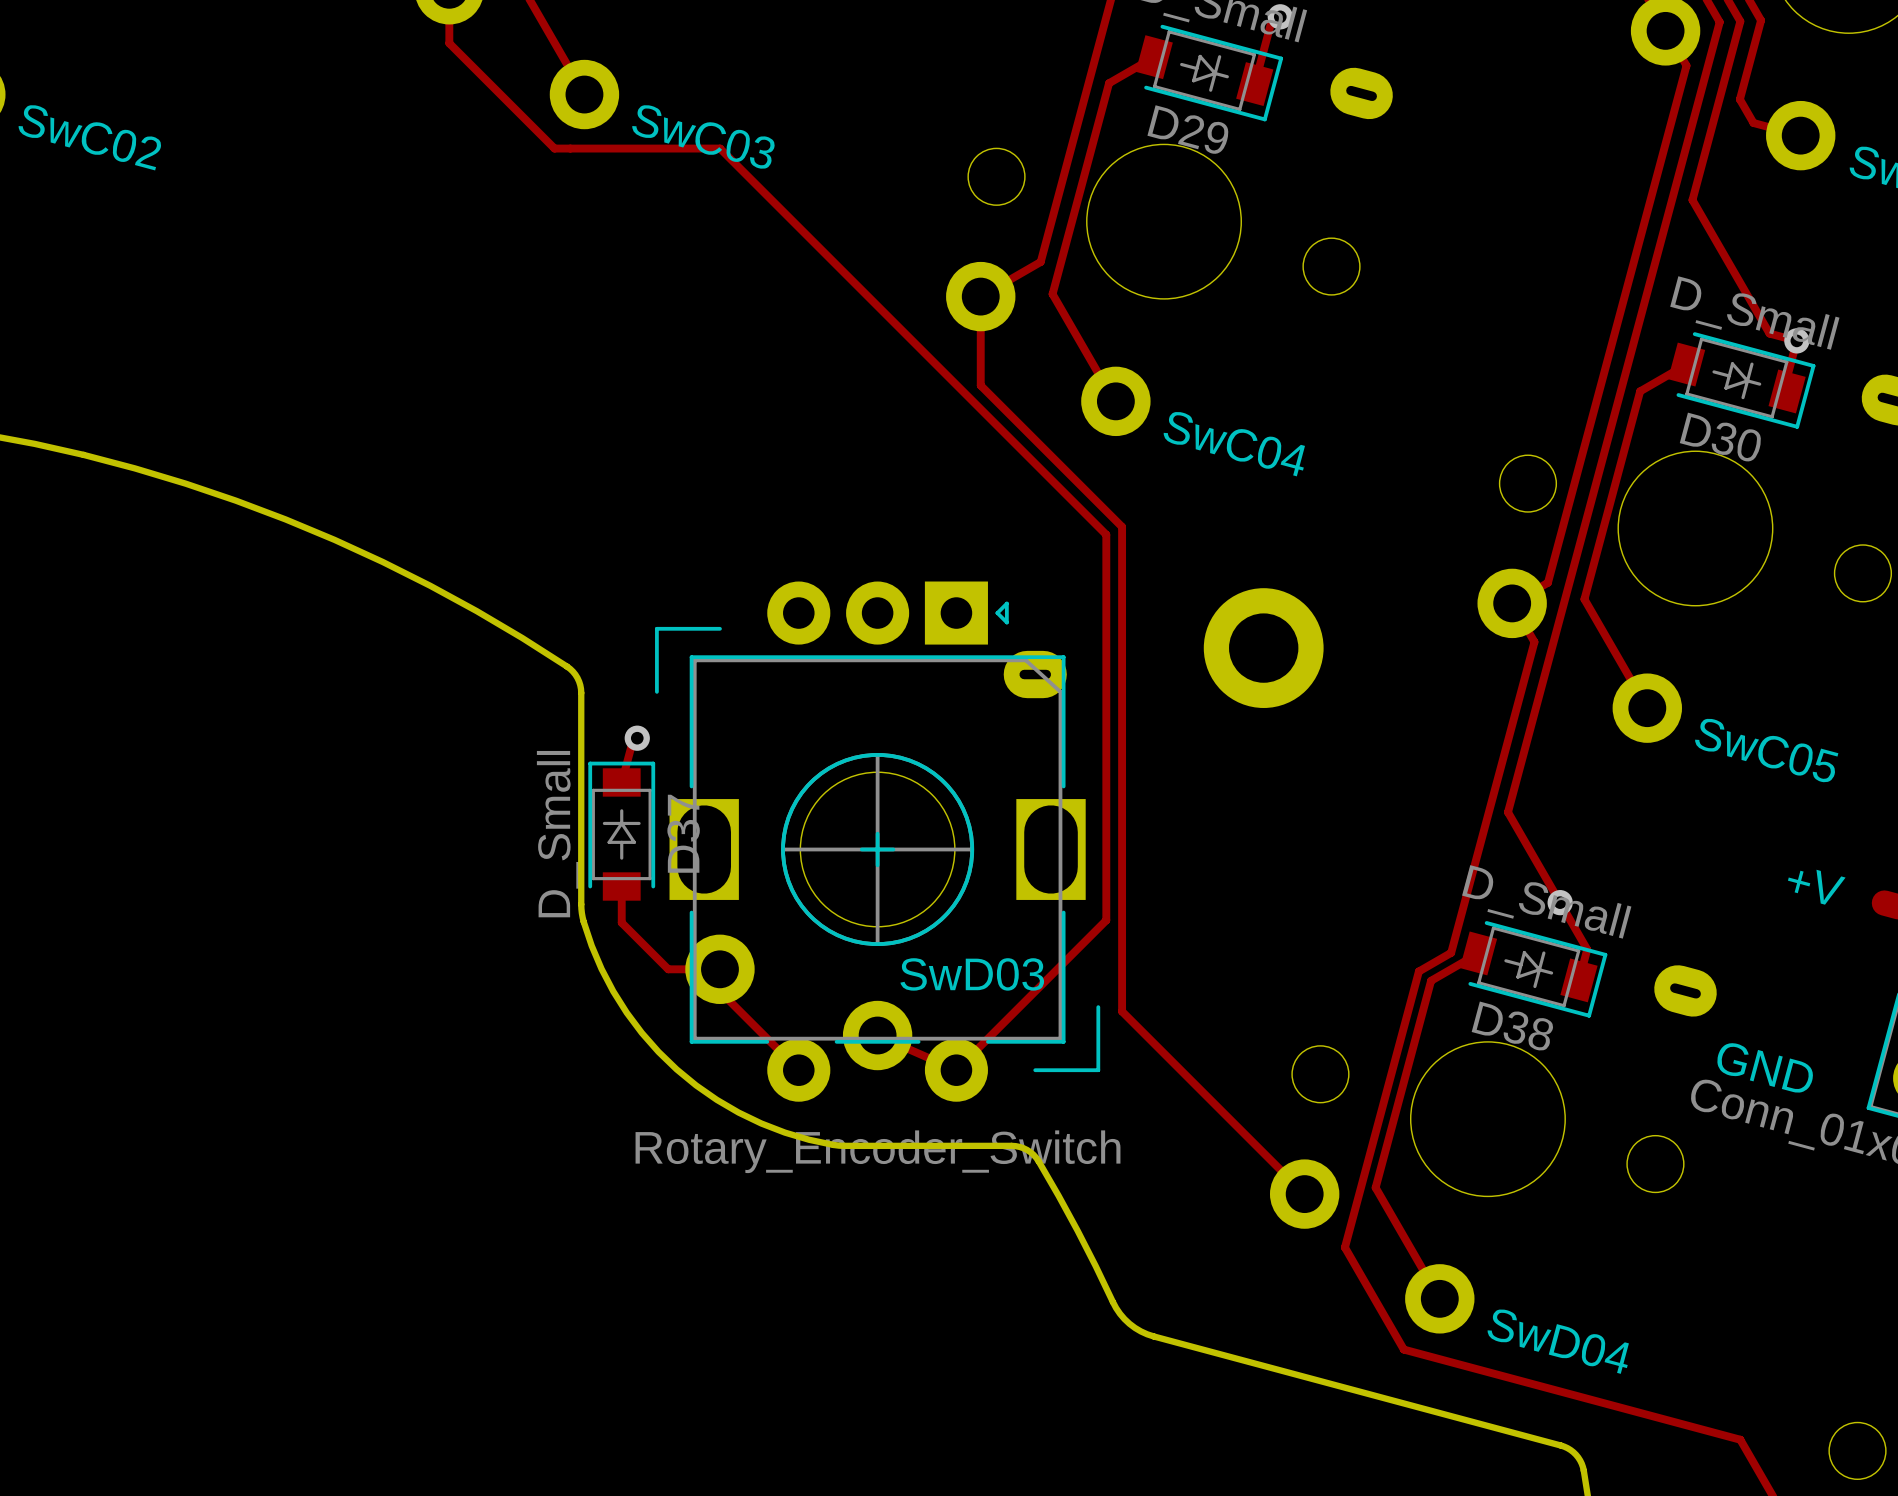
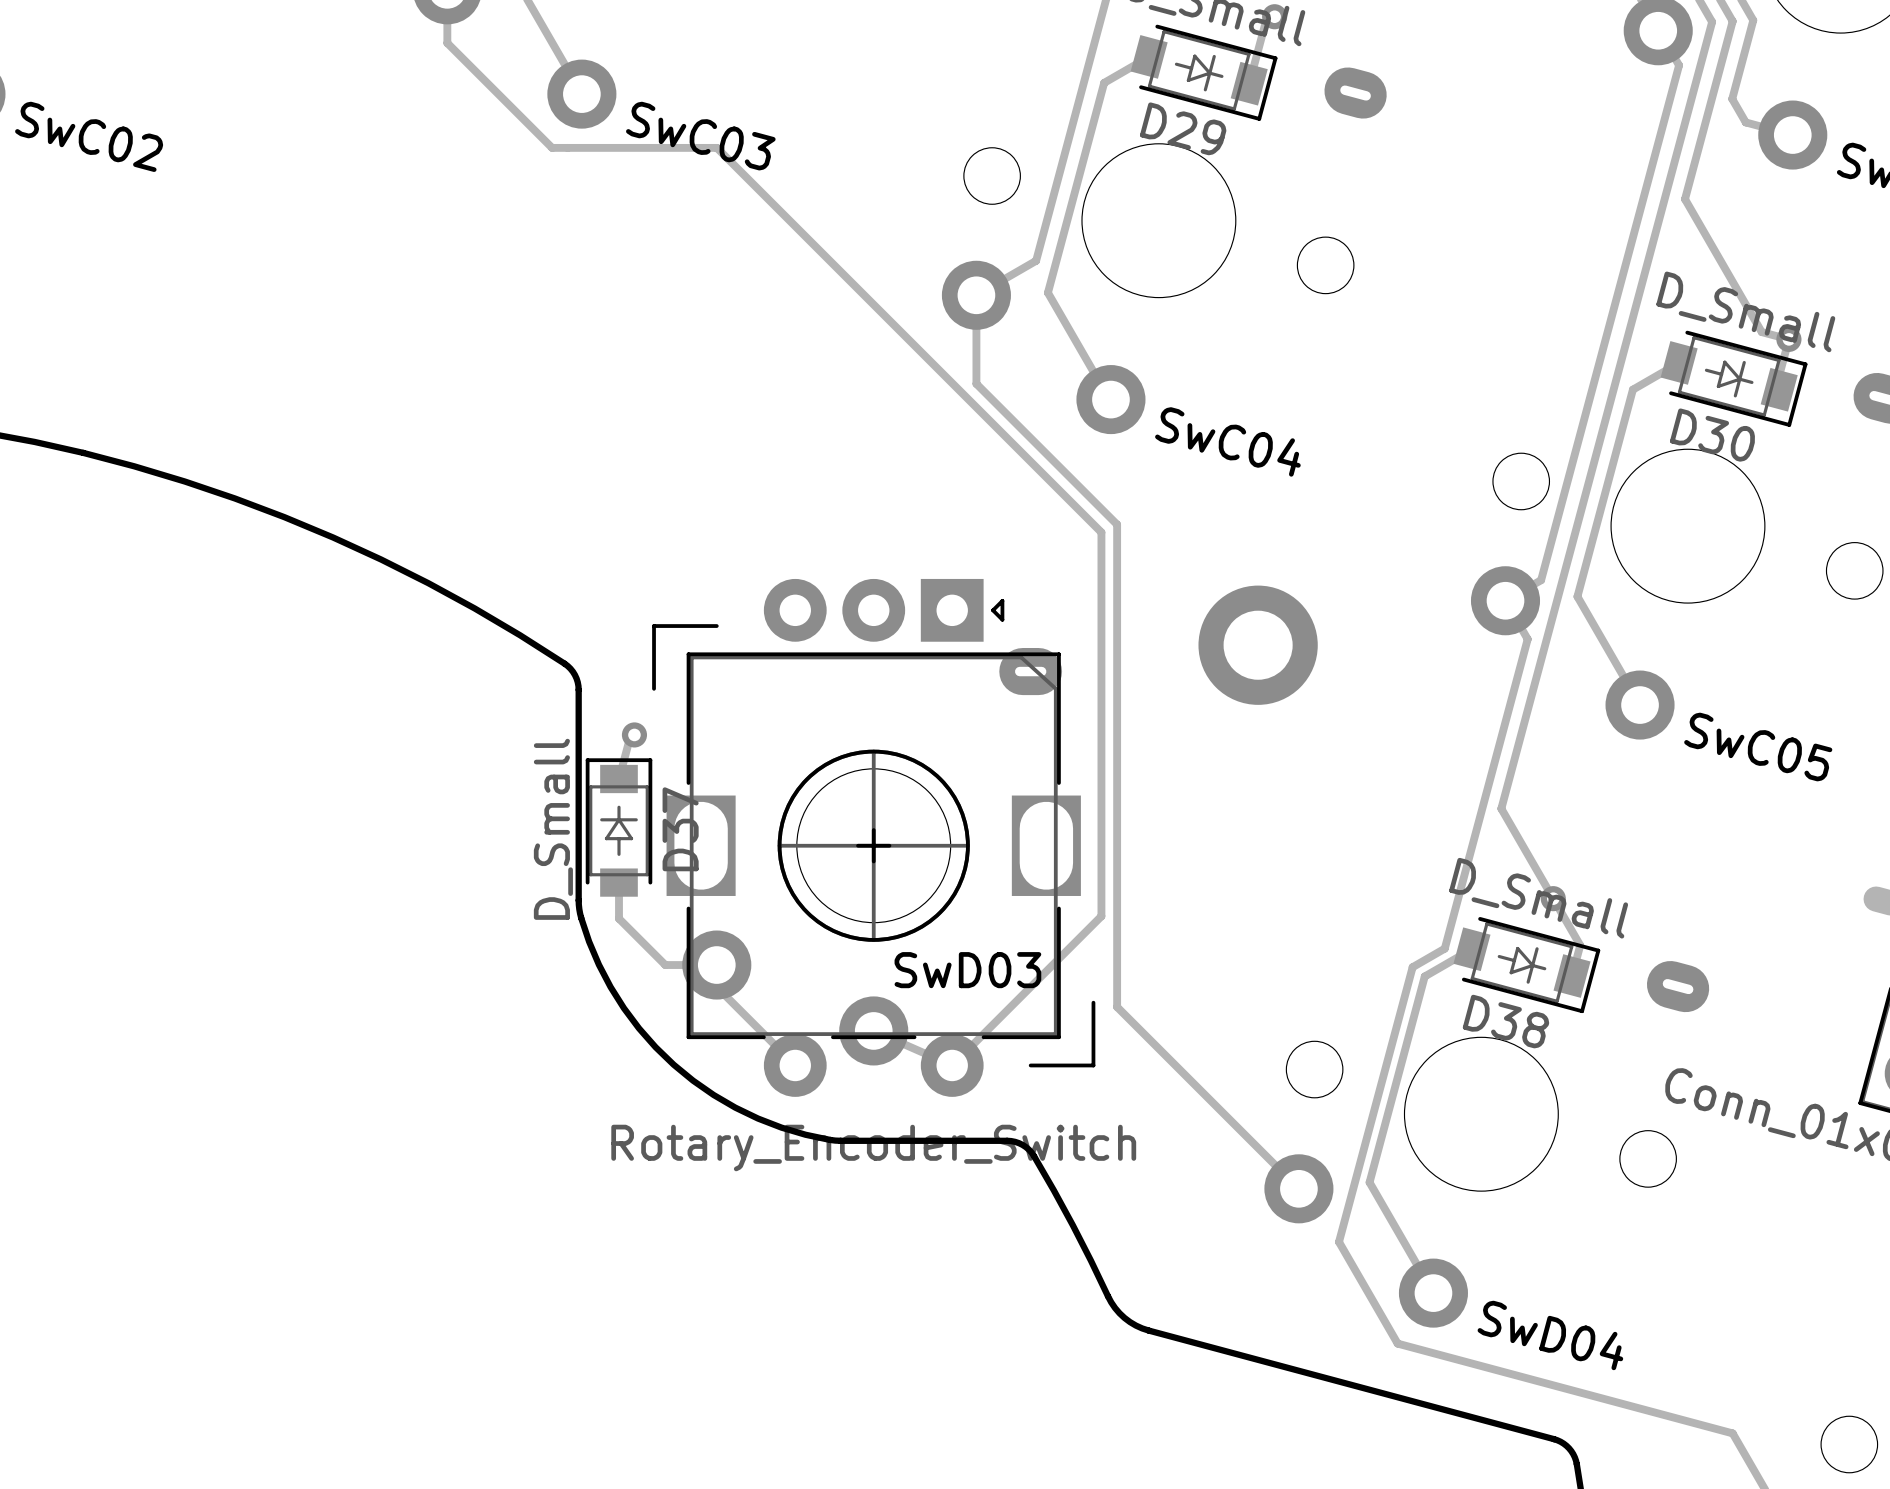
text: +V (1816, 887) -> none
text: GND (1765, 1067) -> none

